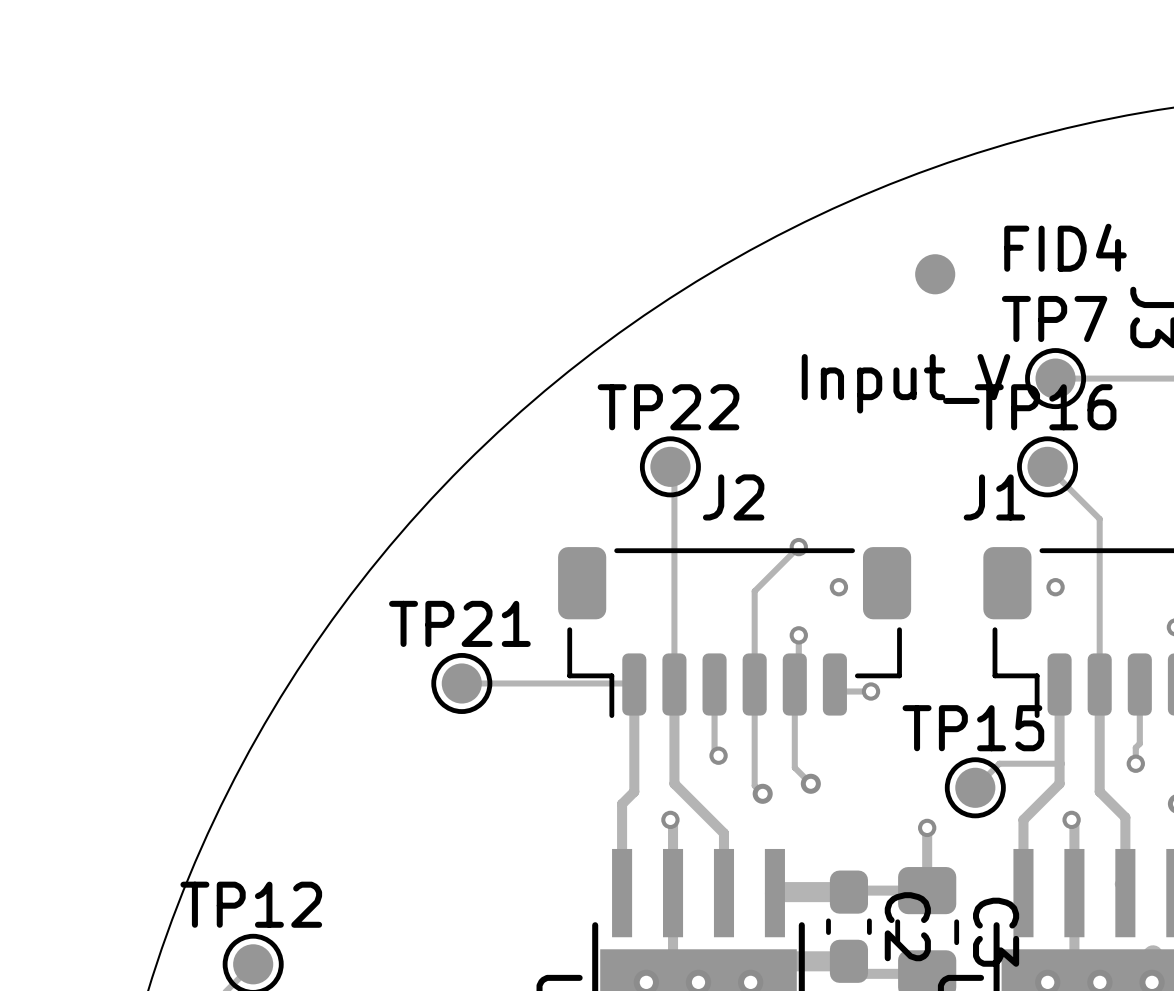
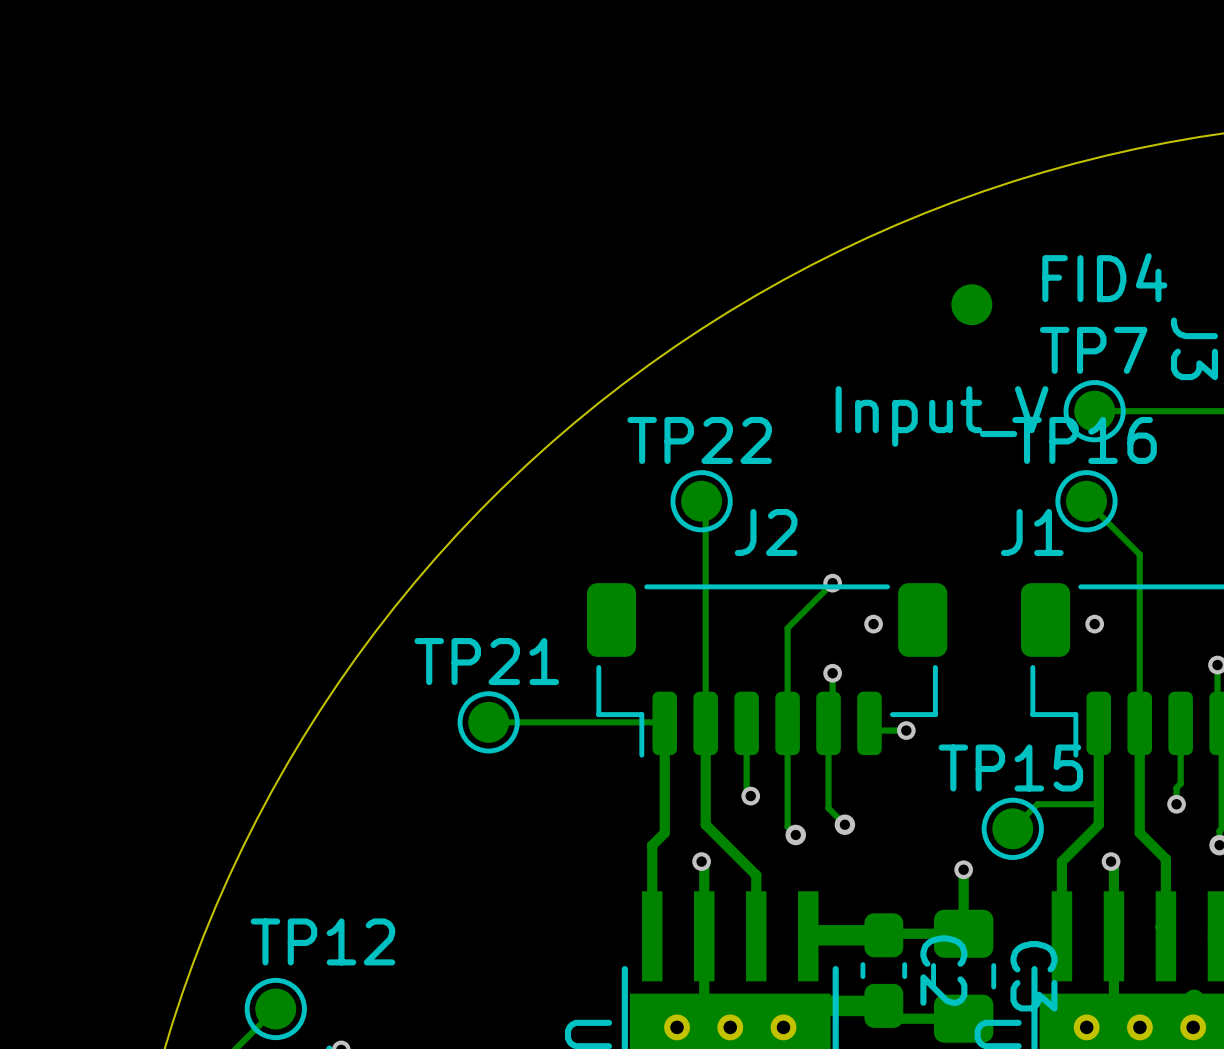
TP12 name position: TP12 (251, 904) -> TP12 (322, 941)

